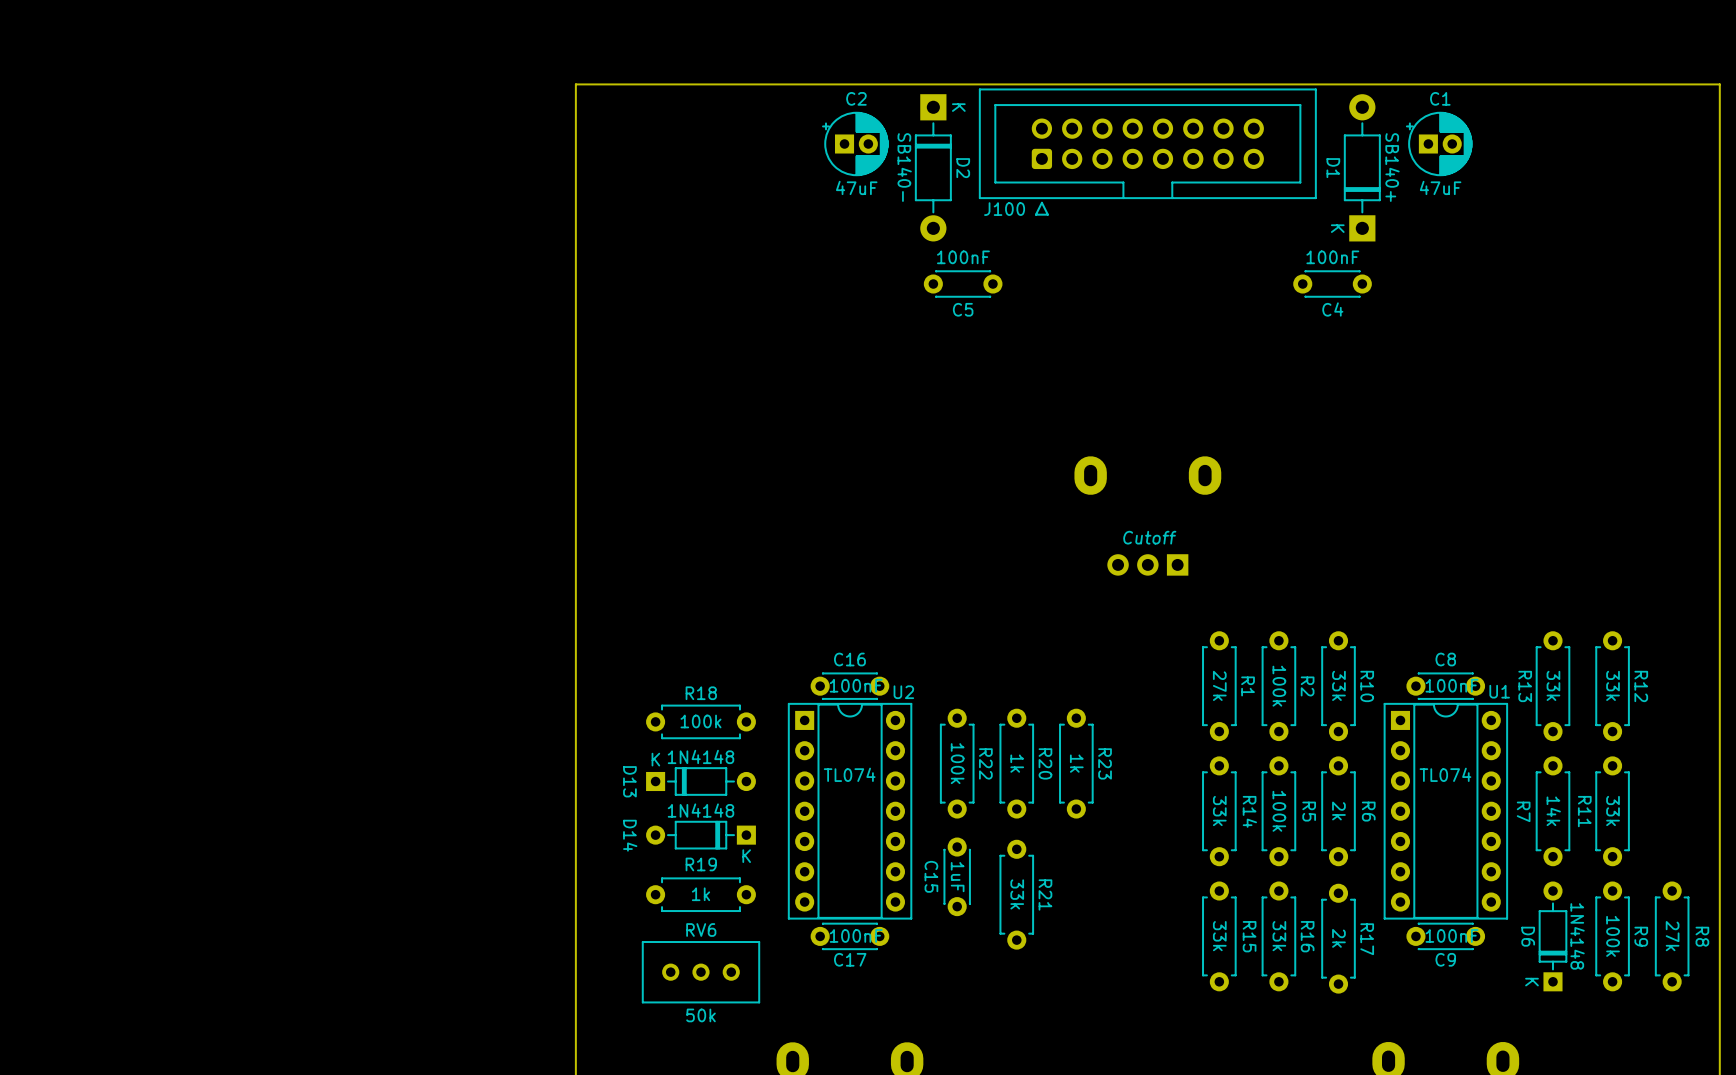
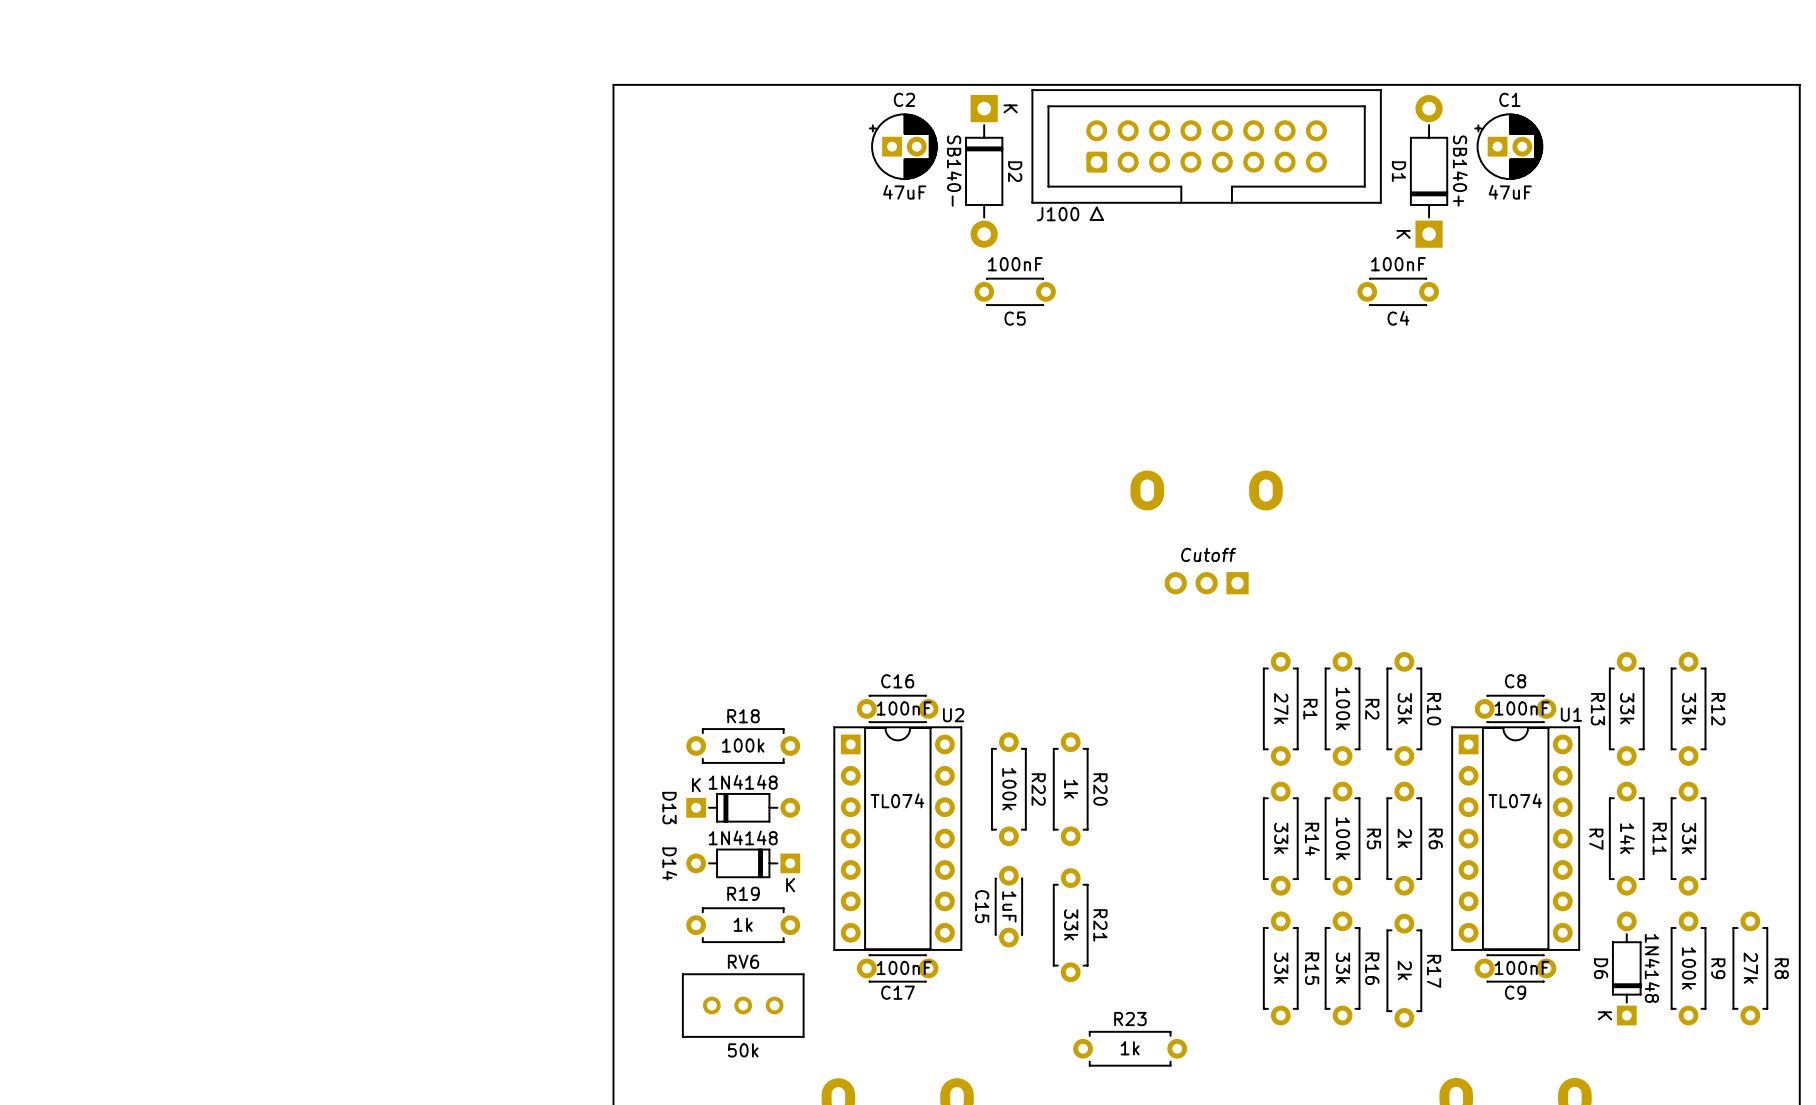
R23 rotation: 0° (1076, 763) -> 90° clockwise (1130, 1048)
R23 position: (1076, 763) -> (1130, 1048)
R23 name position: R23 (1105, 763) -> R23 (1130, 1019)

